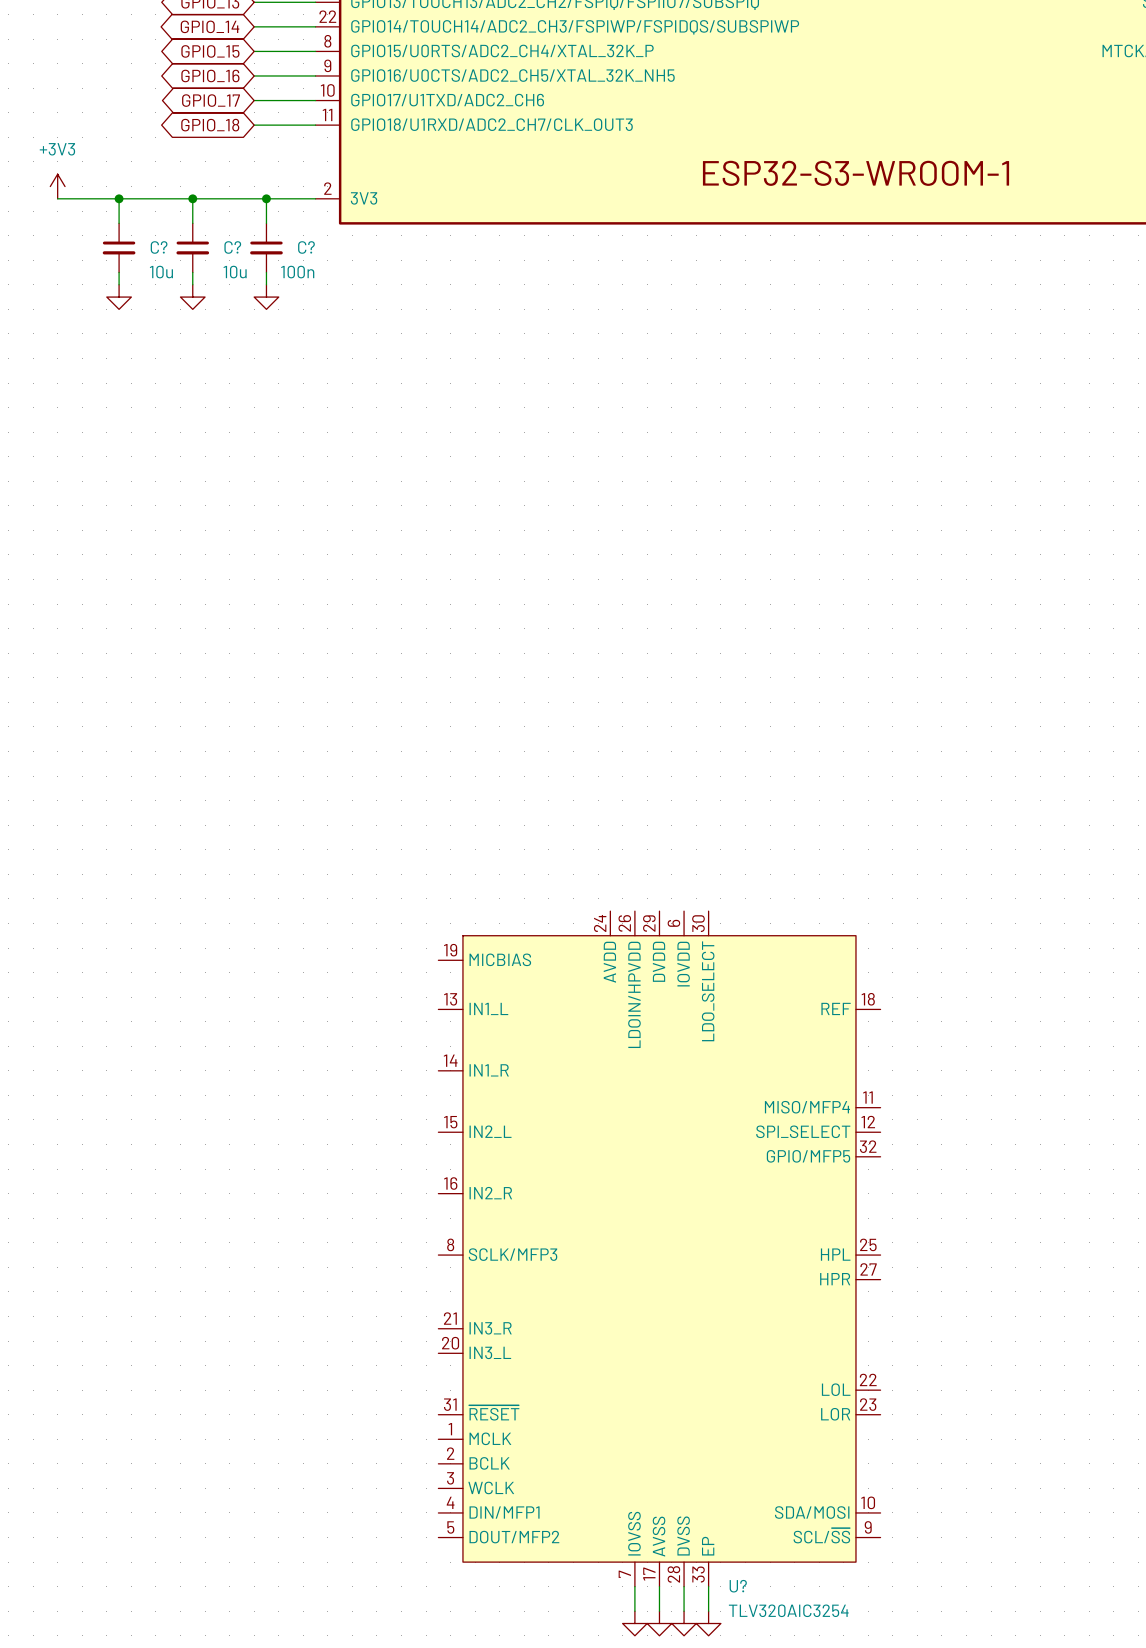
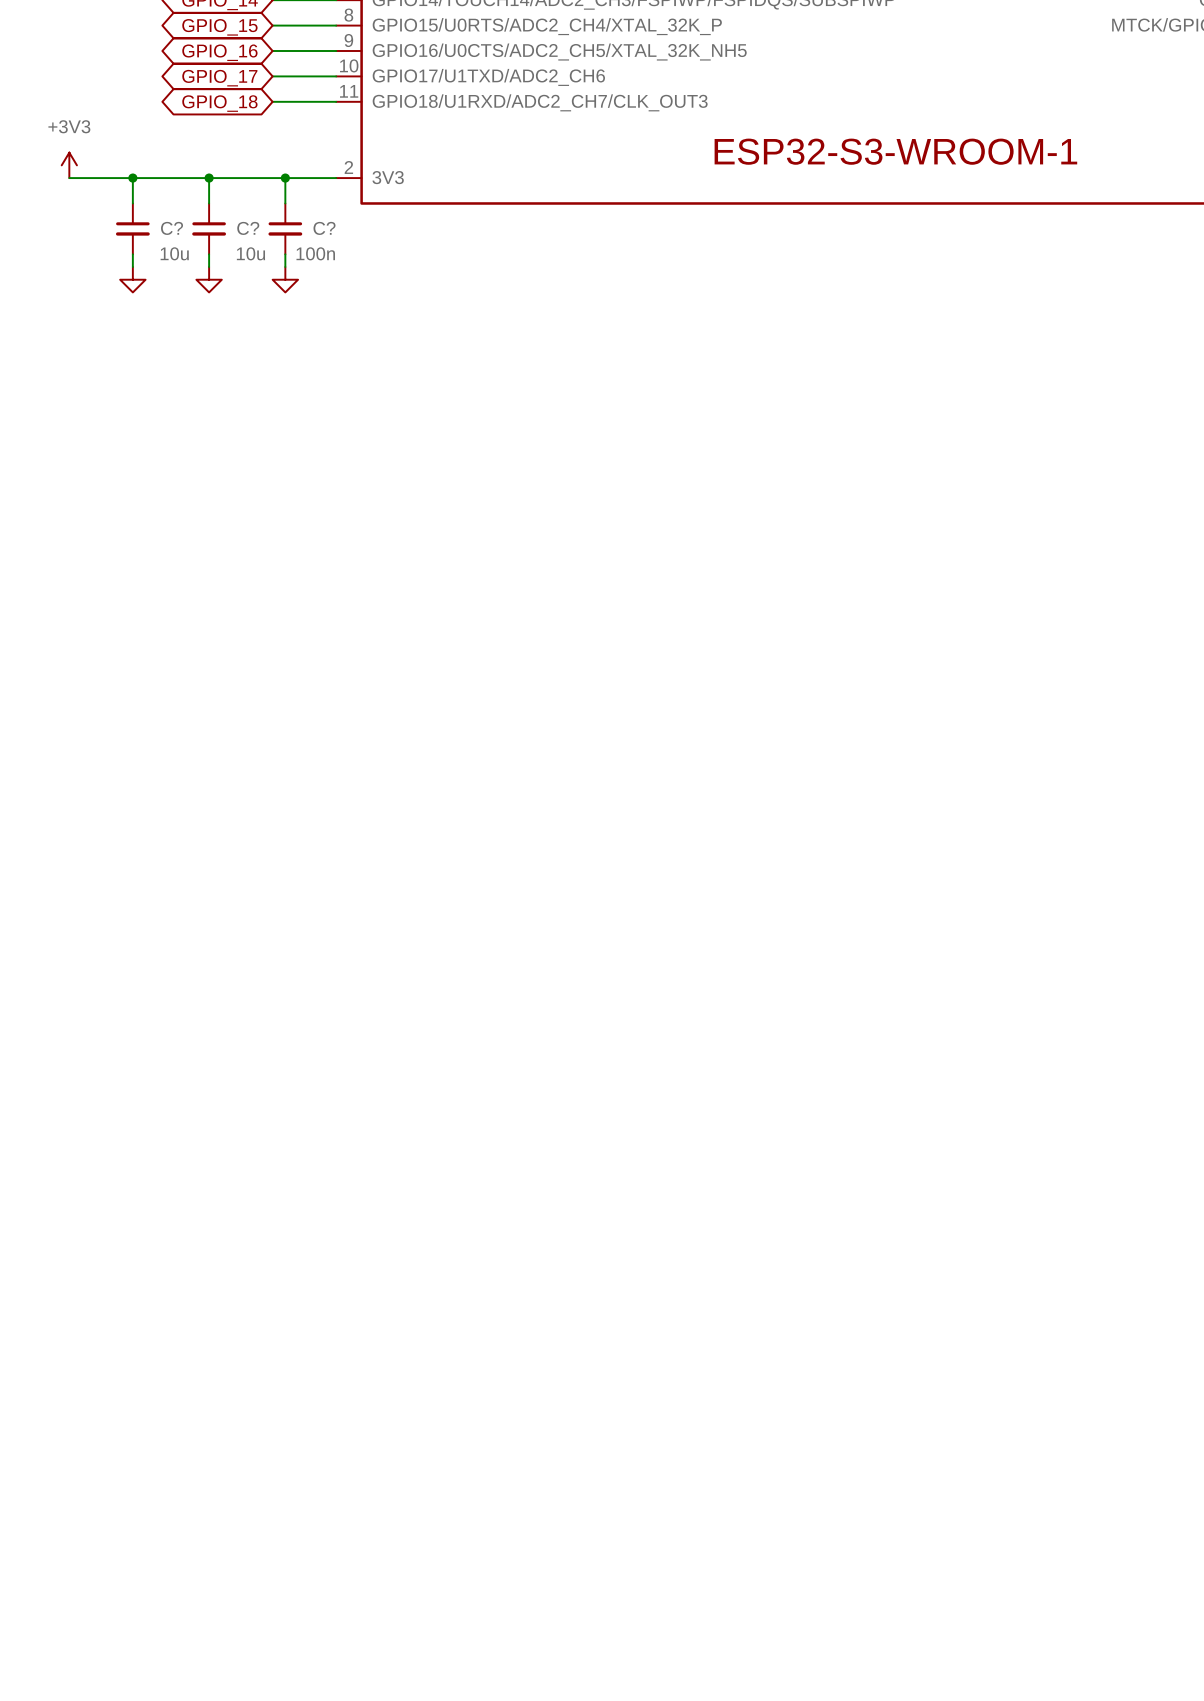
U?: TLV320AIC3254 (659, 1248) -> none
wire: (634, 1586) (634, 1611) -> none
wire: (659, 1586) (659, 1611) -> none
wire: (684, 1586) (684, 1611) -> none
wire: (708, 1586) (708, 1611) -> none
power symbol: (634, 1623) -> none
power symbol: (659, 1623) -> none
power symbol: (684, 1623) -> none
power symbol: (708, 1623) -> none

